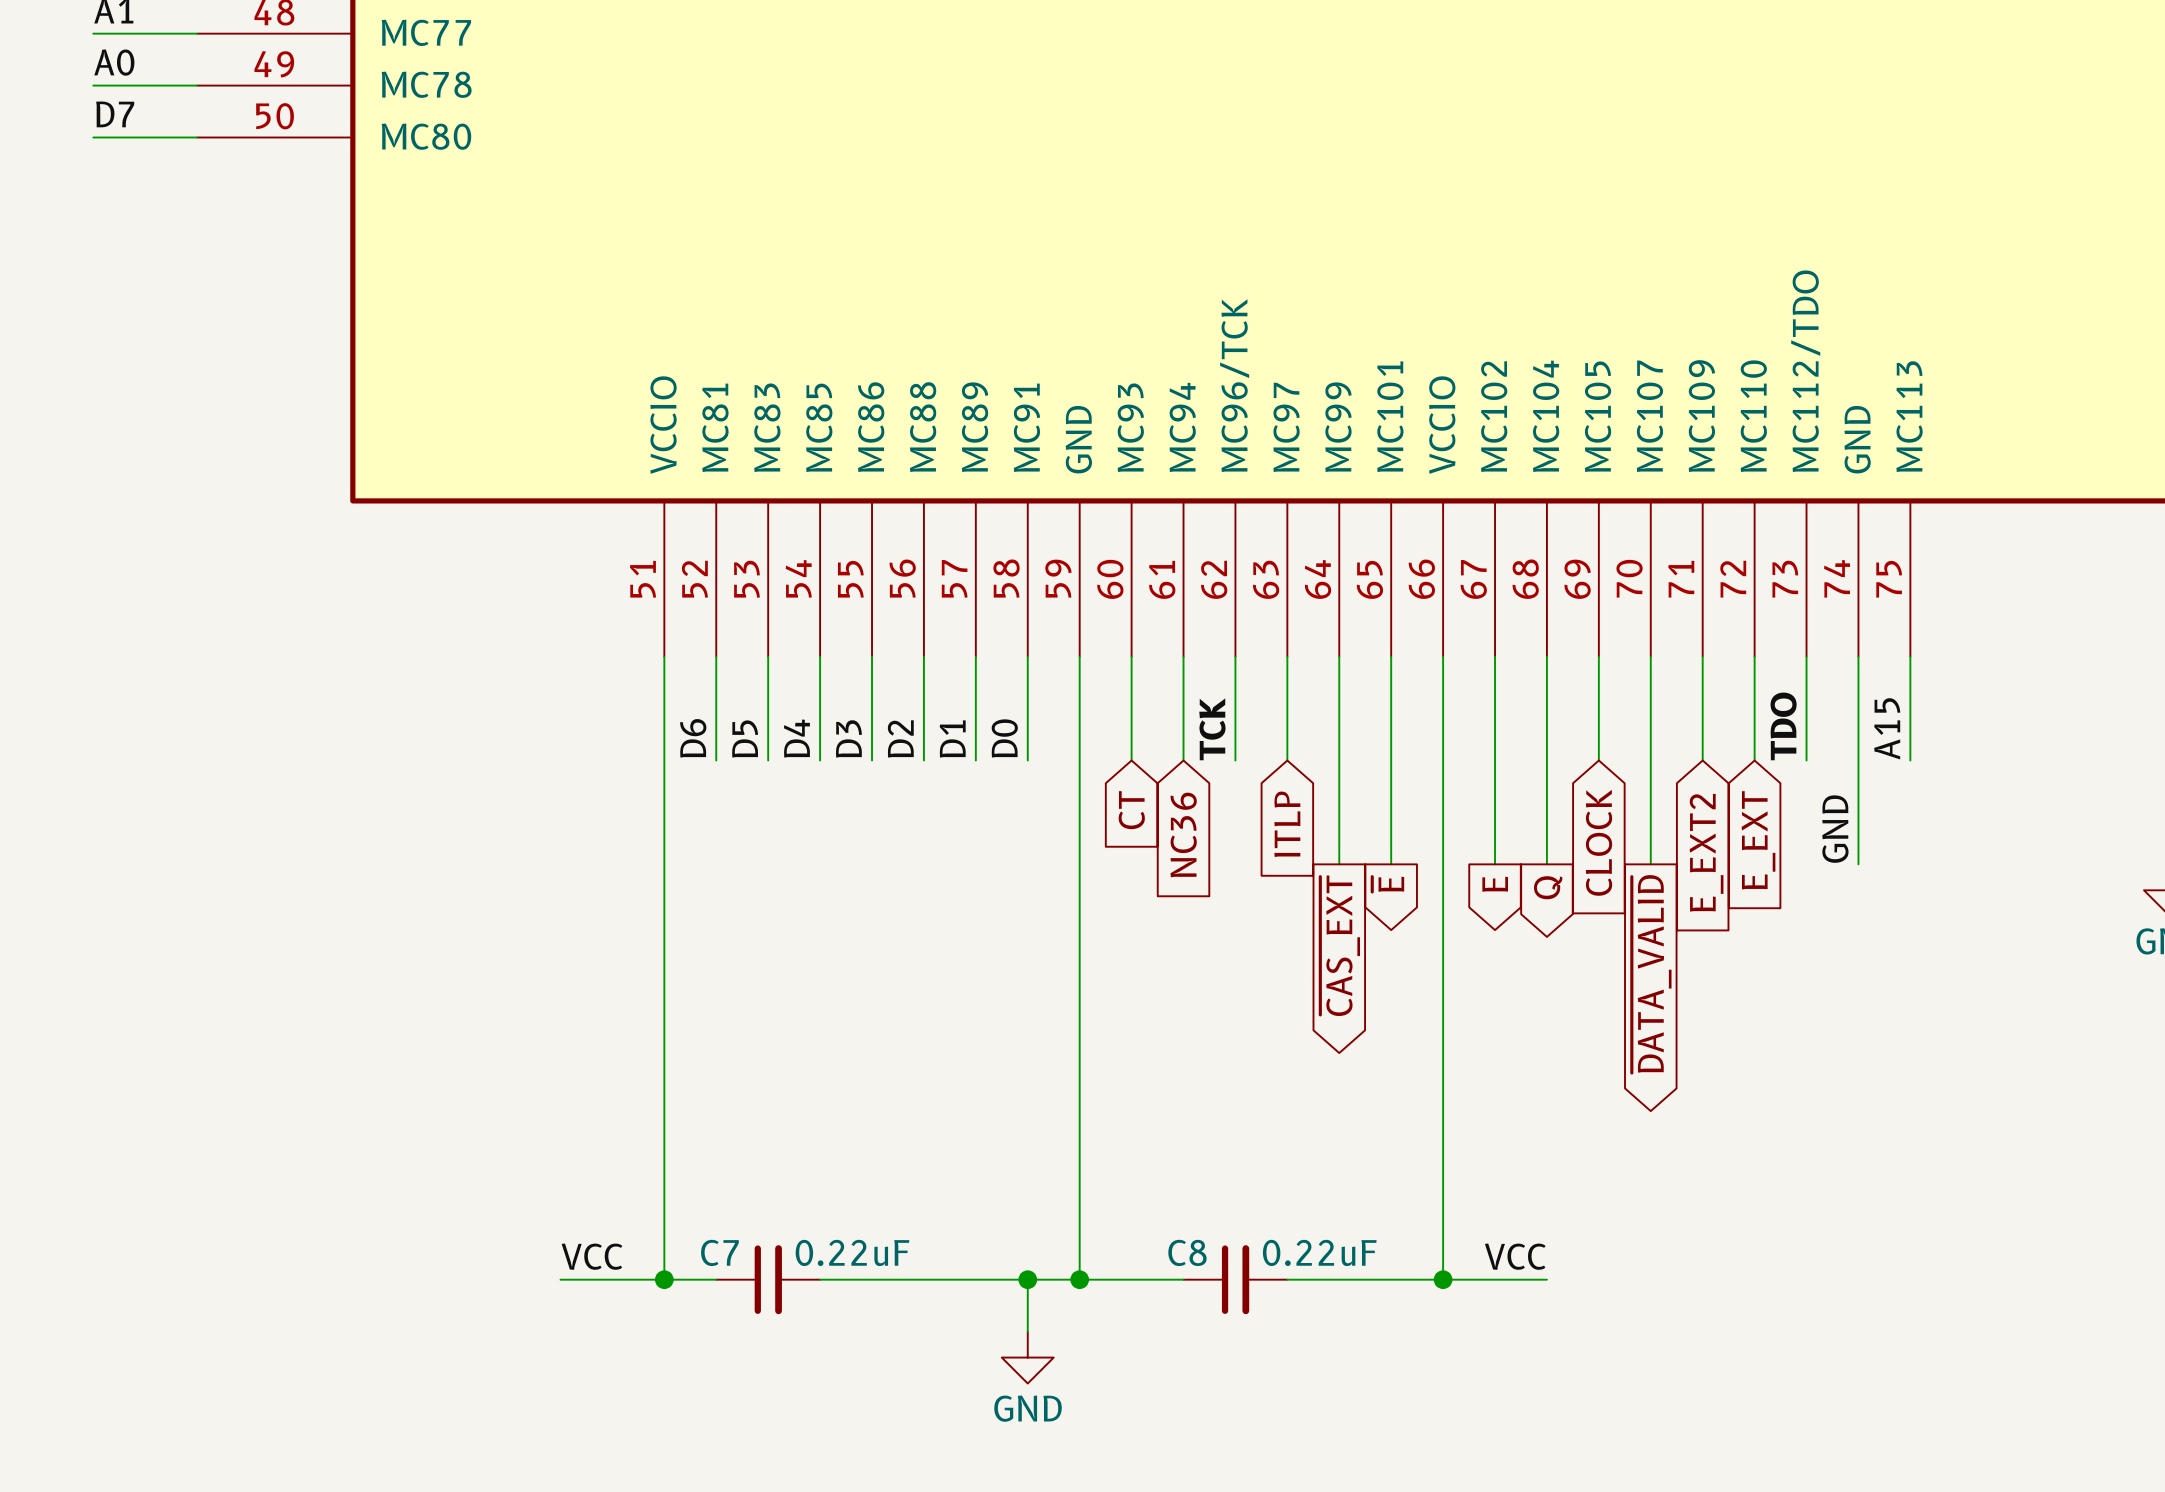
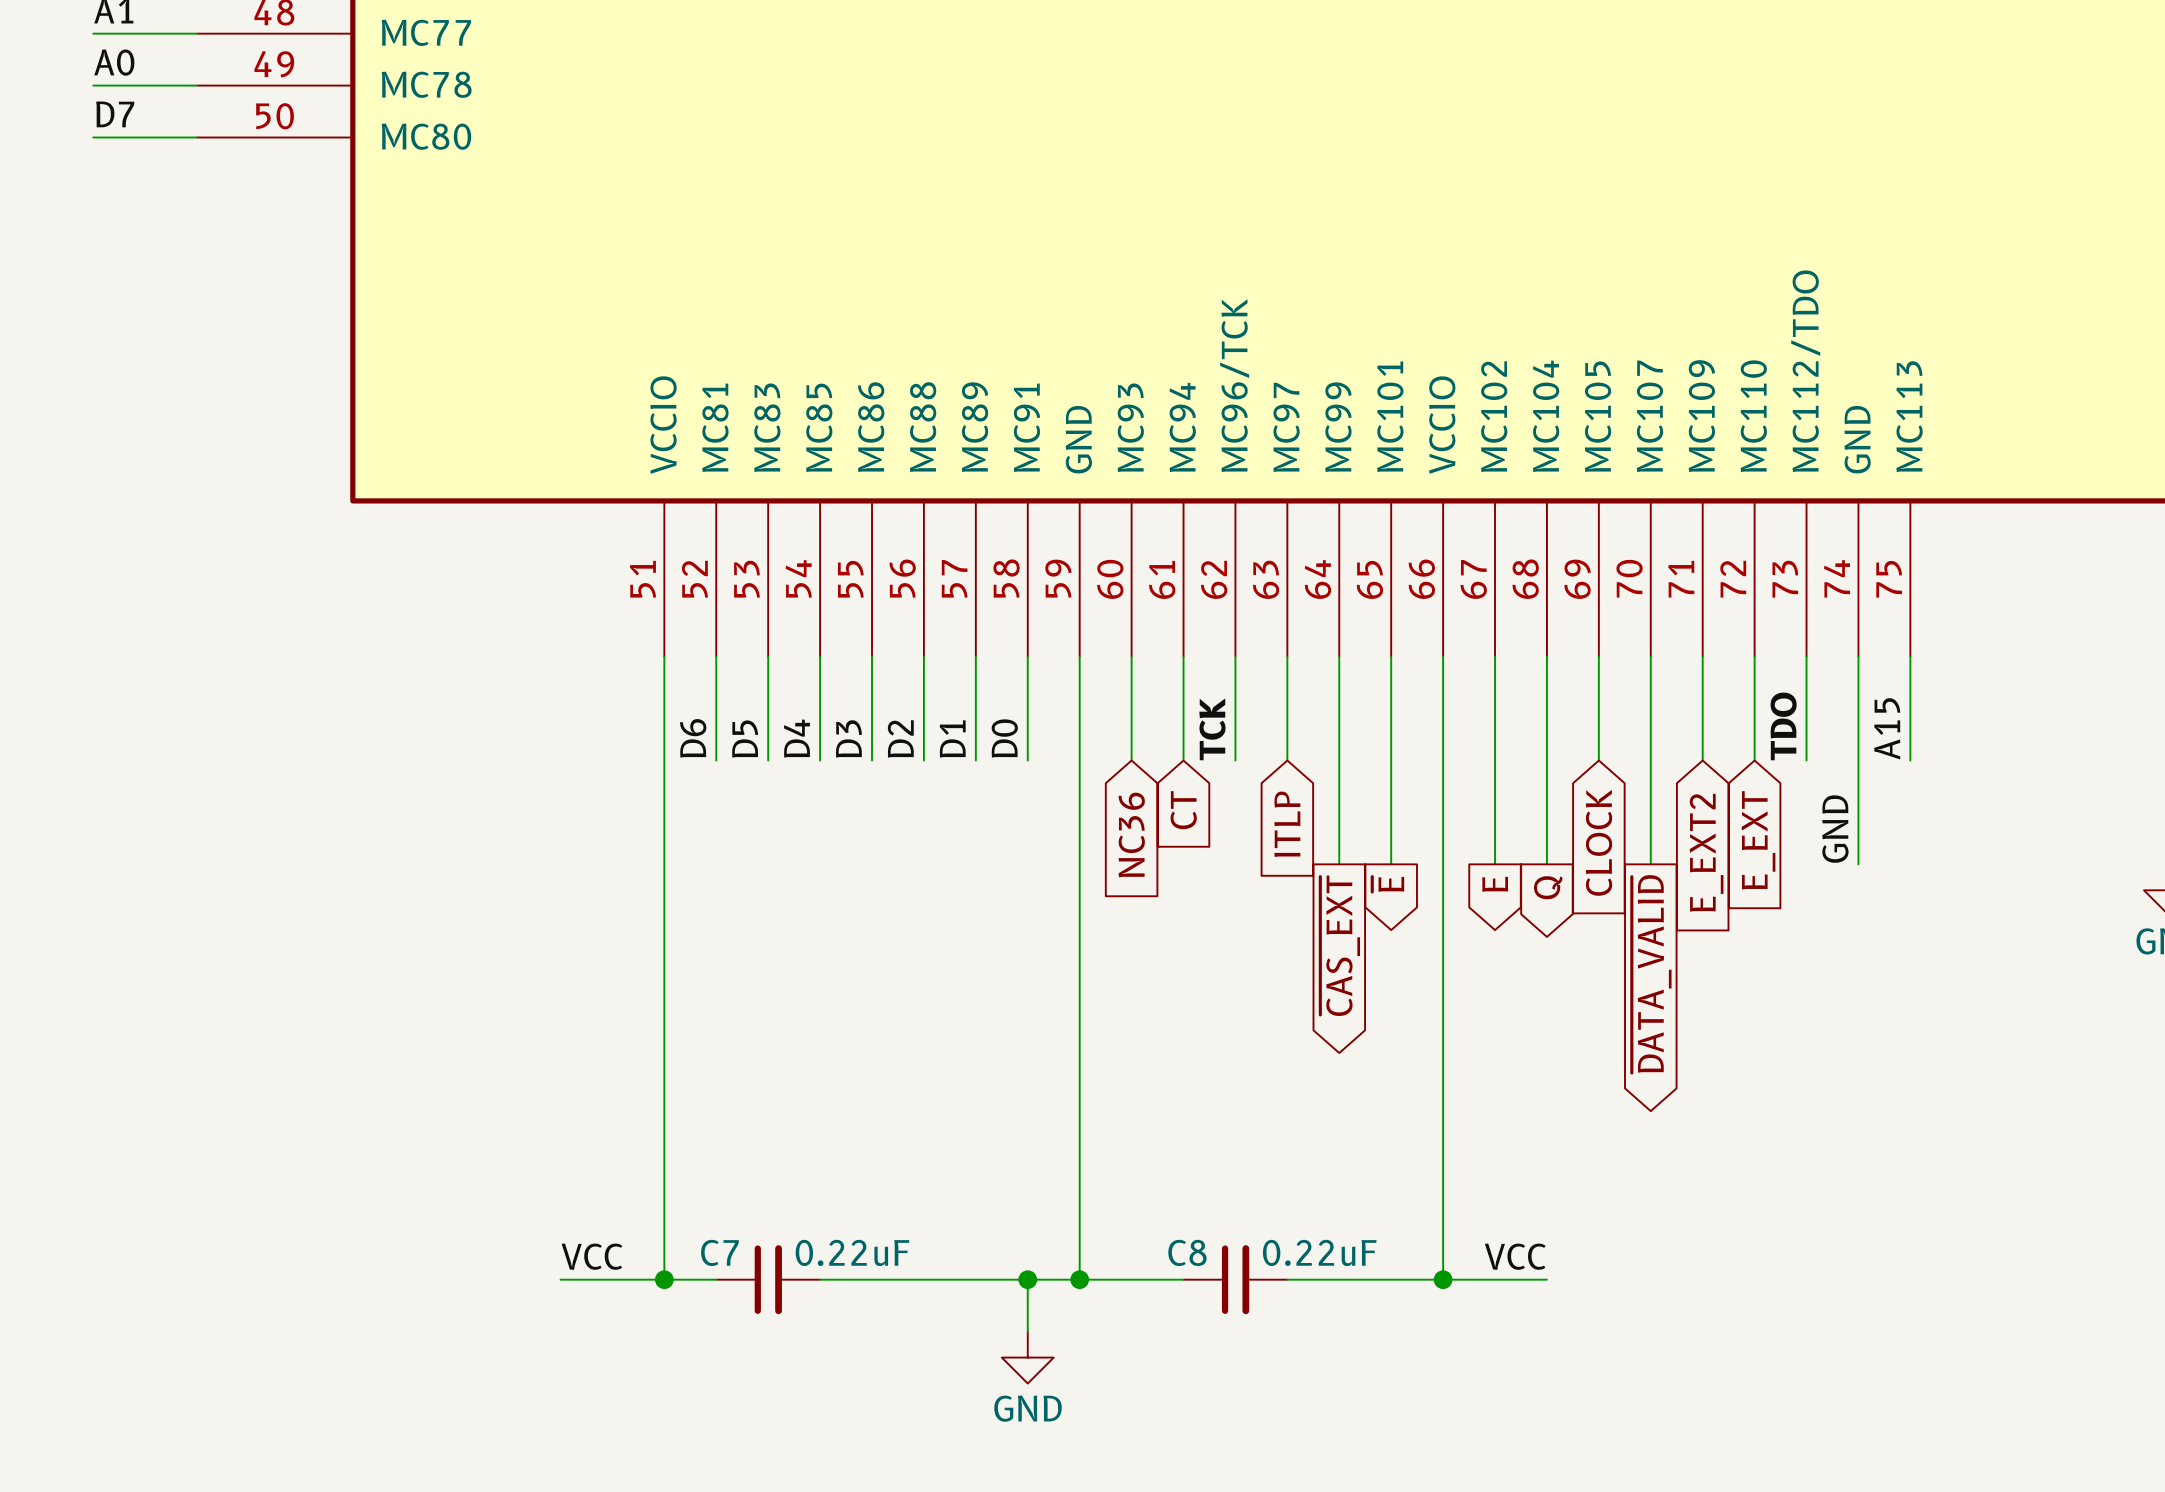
global label: CT (1131, 810) -> NC36 (1131, 835)
global label: NC36 (1183, 835) -> CT (1183, 810)

